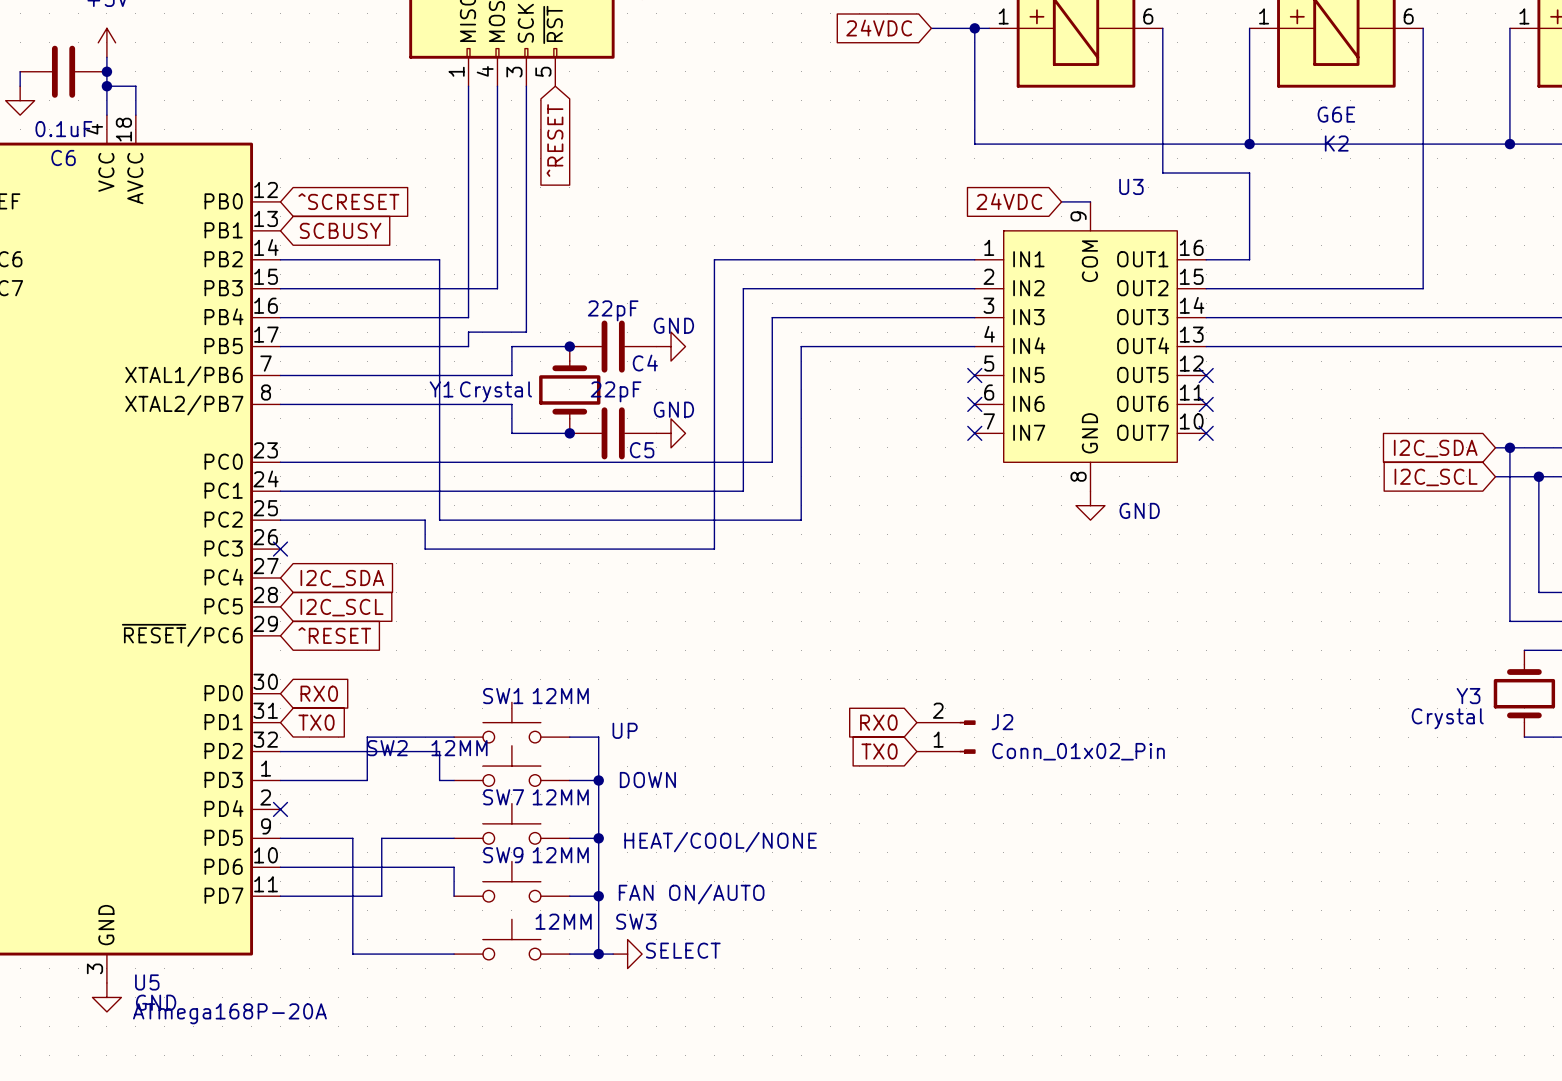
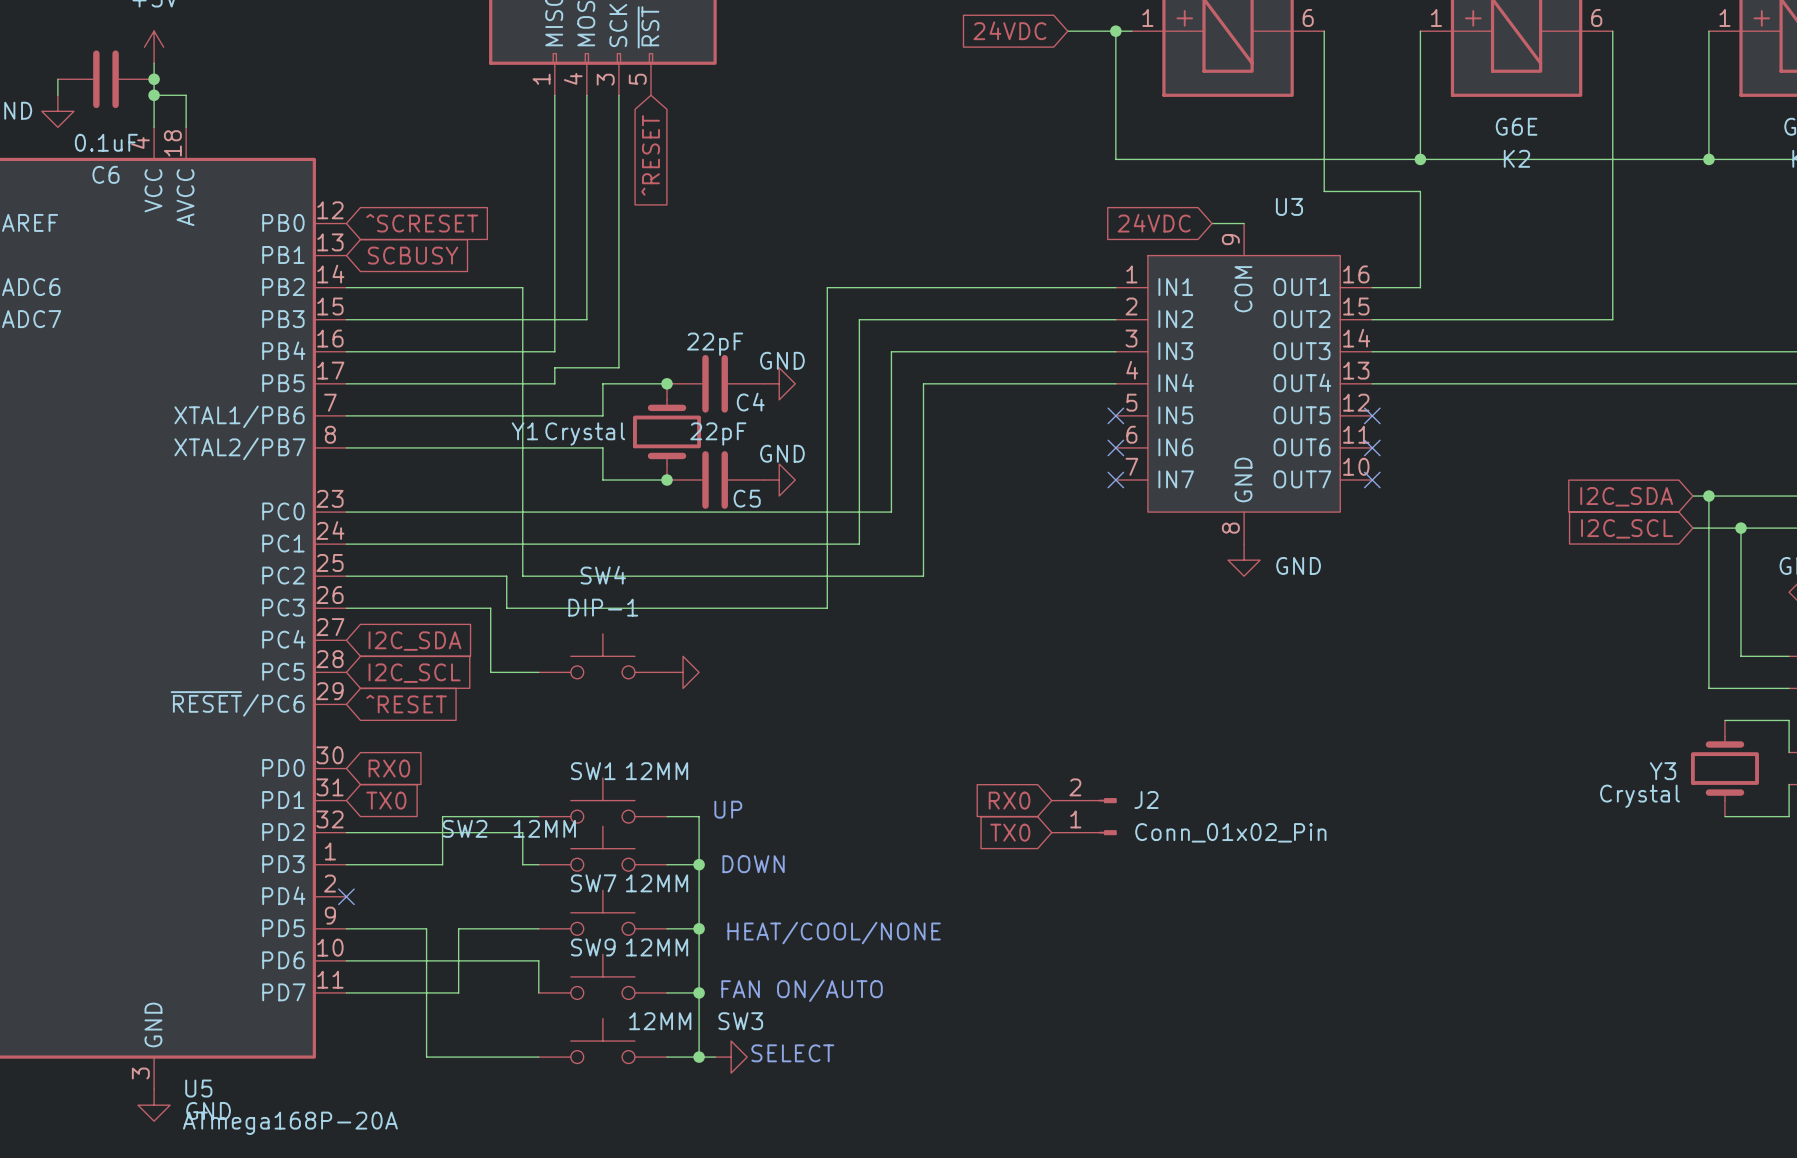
wire: none -> (346, 608) (490, 608) (490, 672) (538, 672)
no-connect mark: (280, 549) -> none
SW4: none -> DIP-1 (602, 656)
power symbol: none -> (683, 672)

